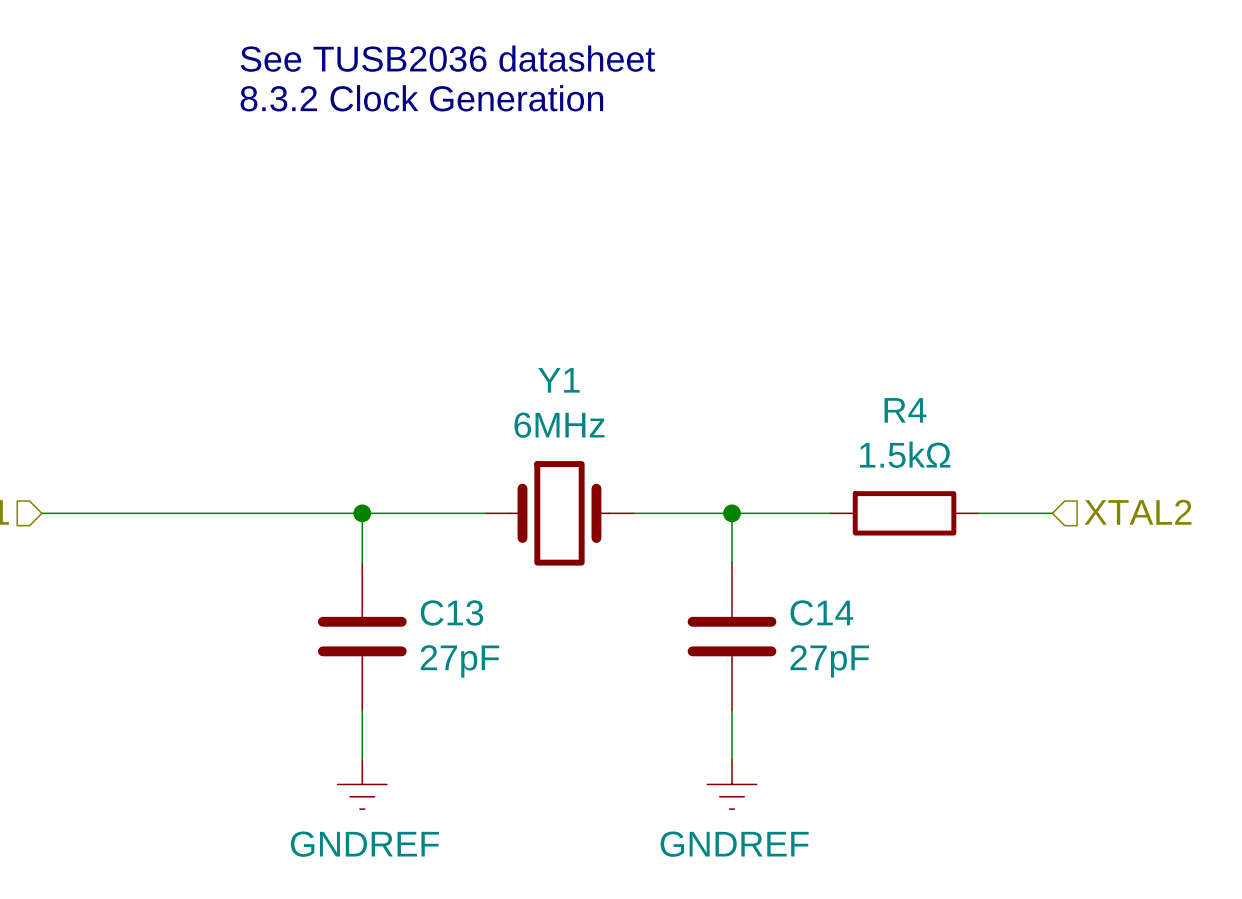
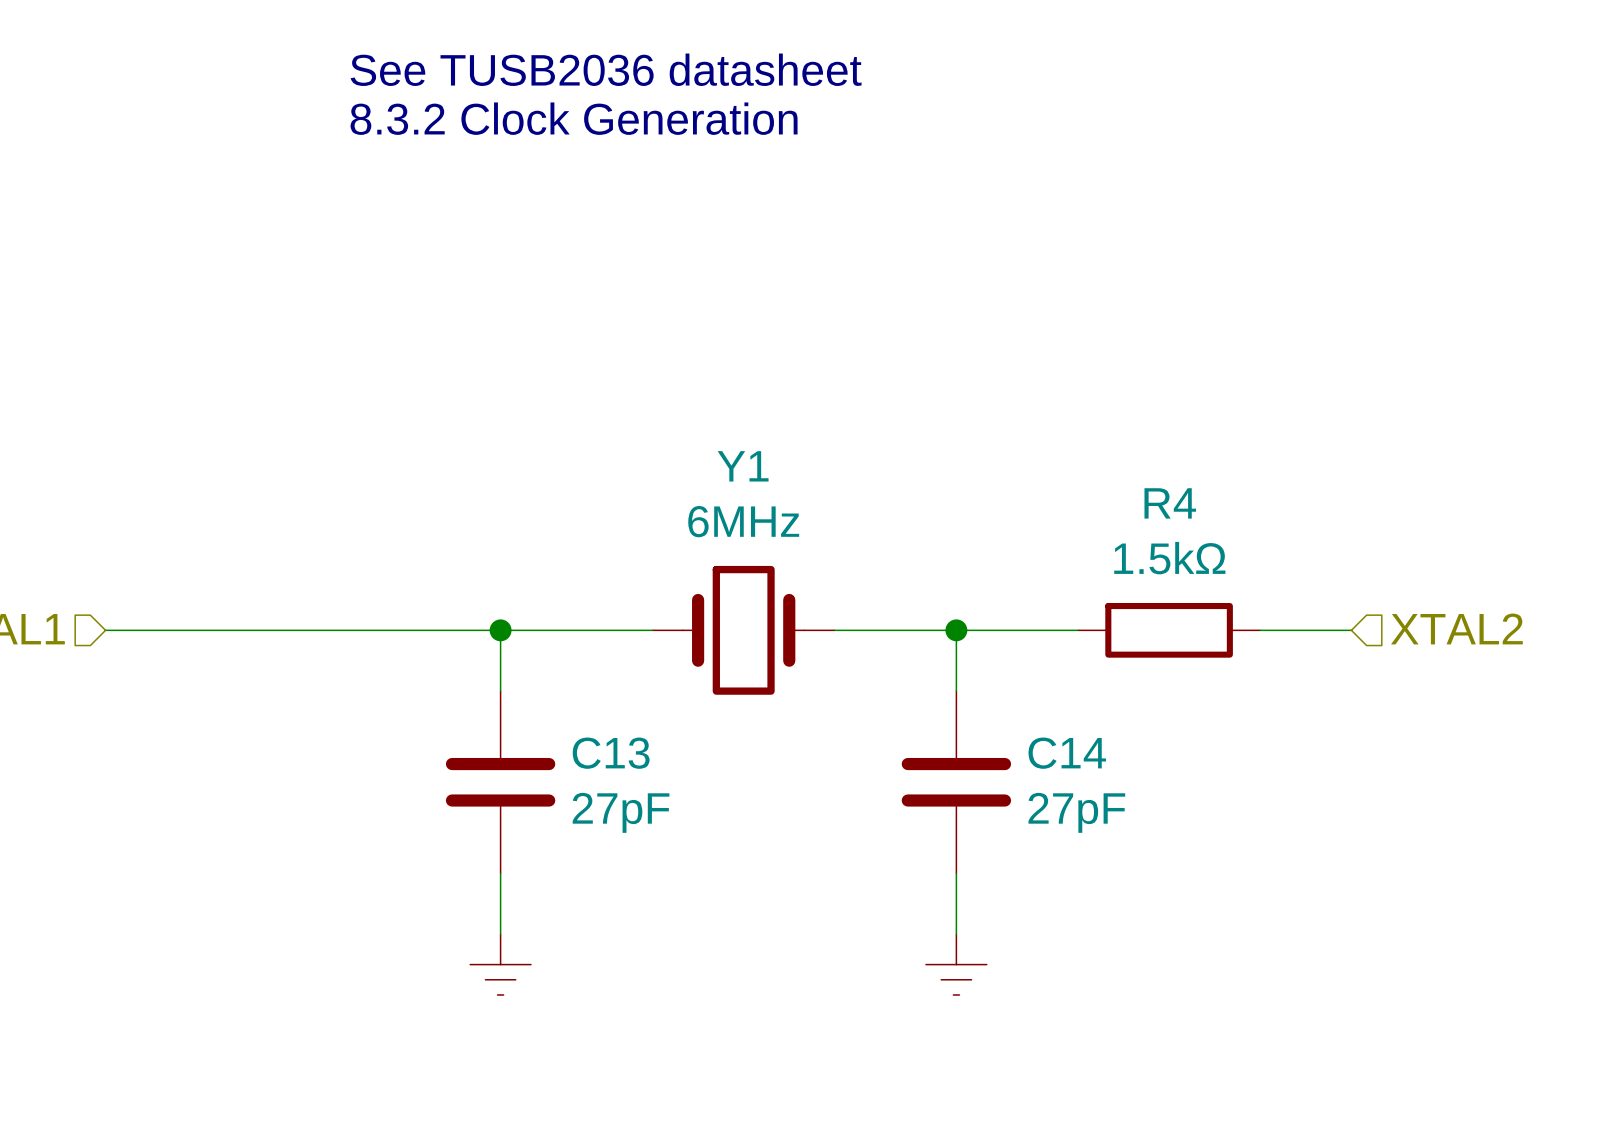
power symbol text: GNDREF (364, 844) -> none
power symbol text: GNDREF (734, 844) -> none

